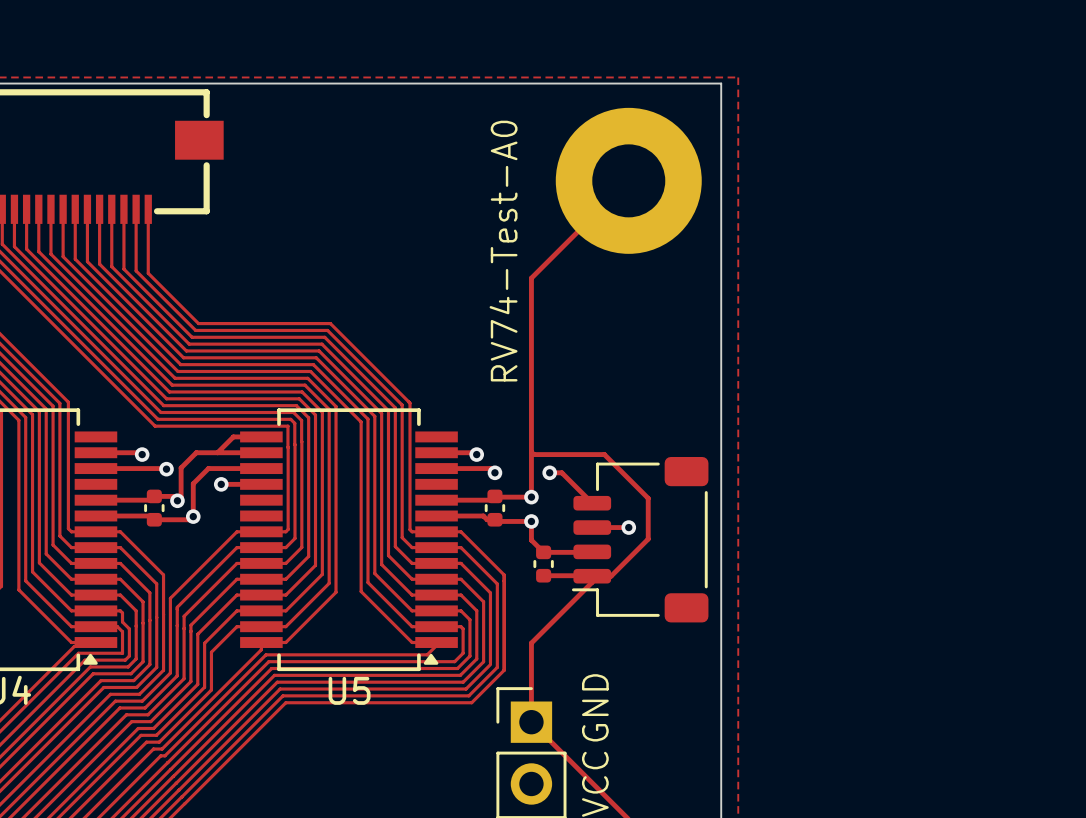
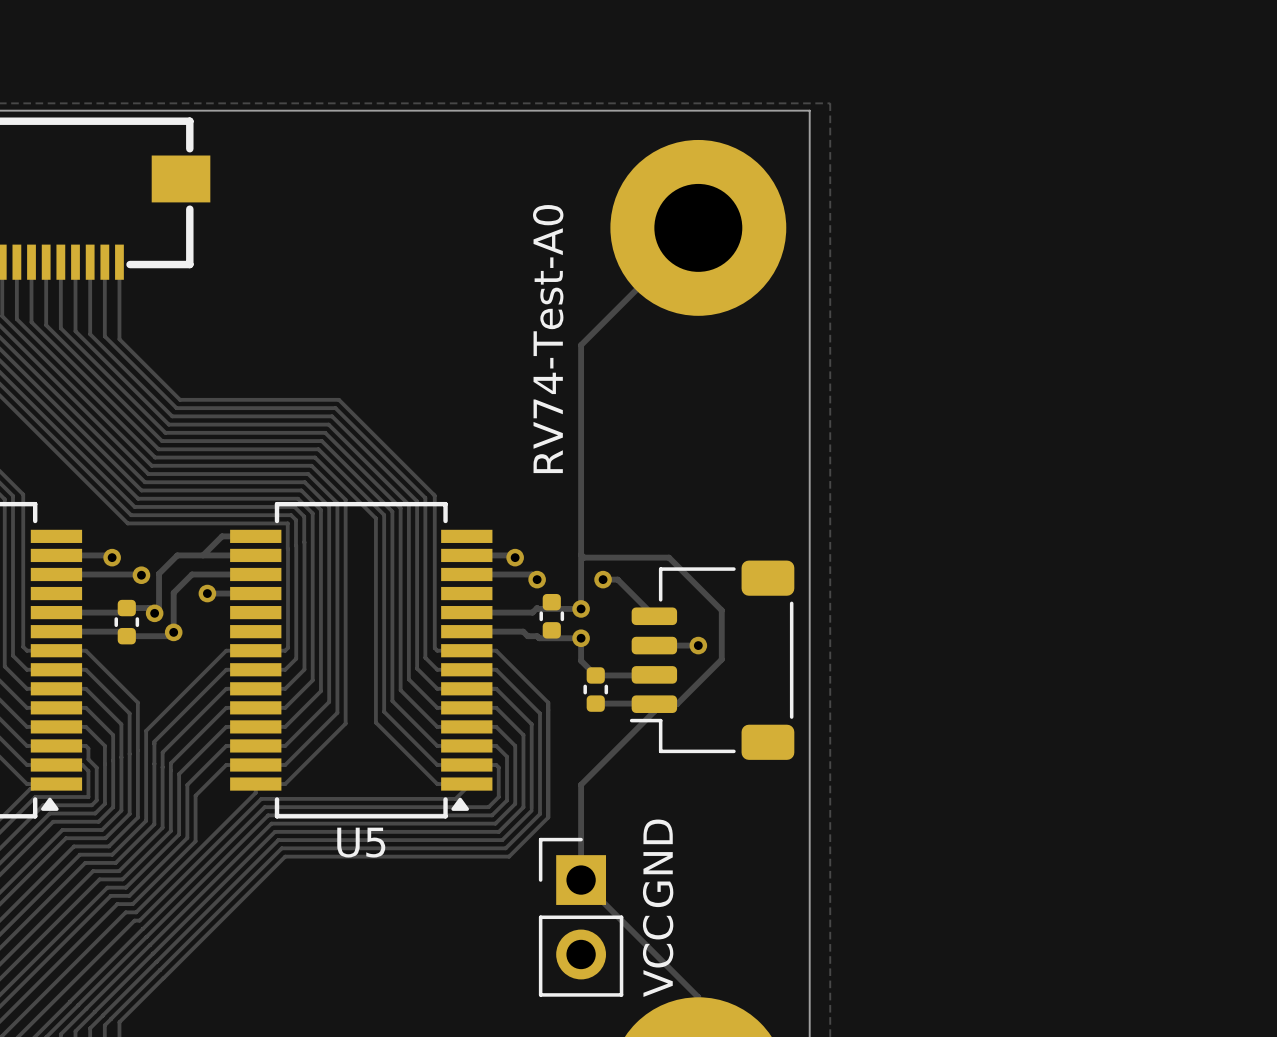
part position: (494, 508) -> (551, 616)

